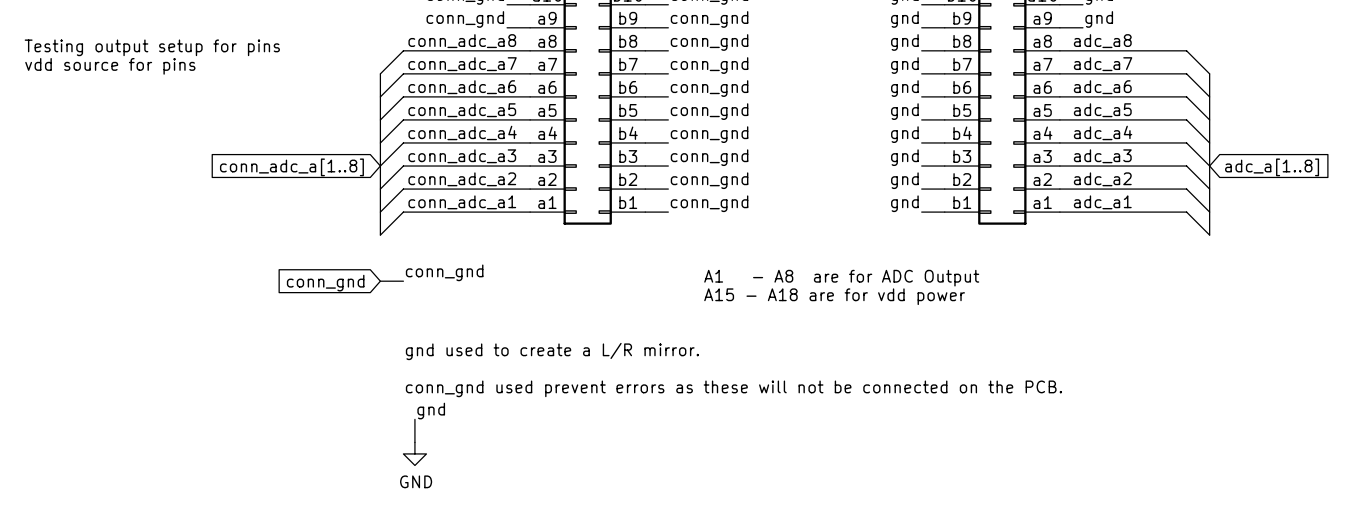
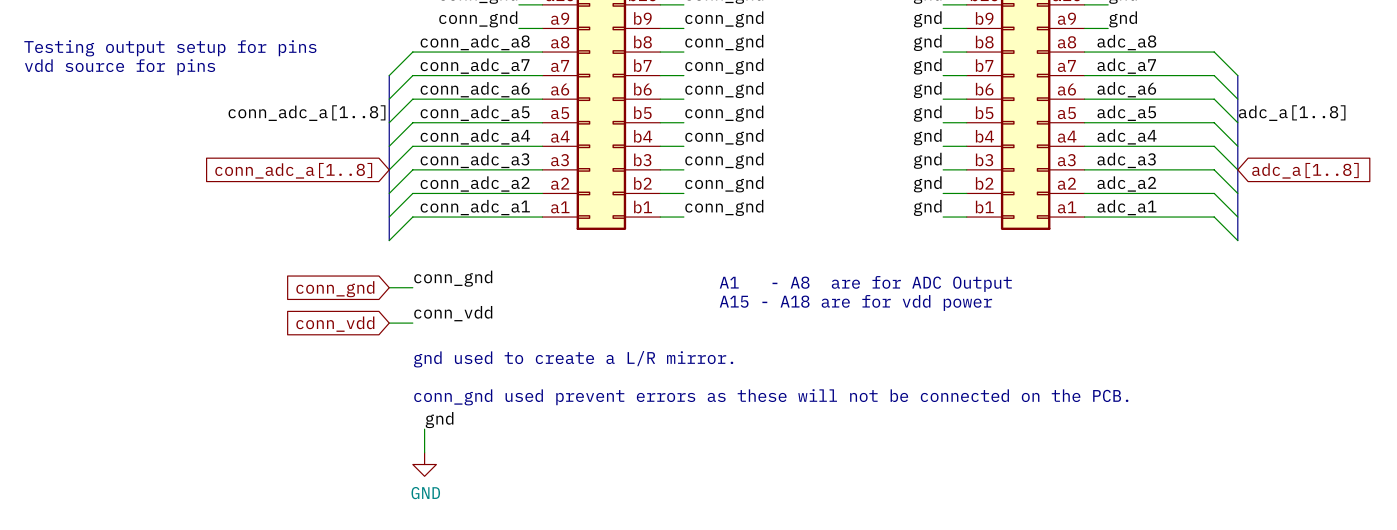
label: none -> conn_adc_a[1..8] (307, 113)
label: none -> adc_a[1..8] (1292, 113)
label: none -> conn_vdd (453, 313)
wire: none -> (389, 323) (412, 323)
global label: none -> conn_vdd (335, 324)

